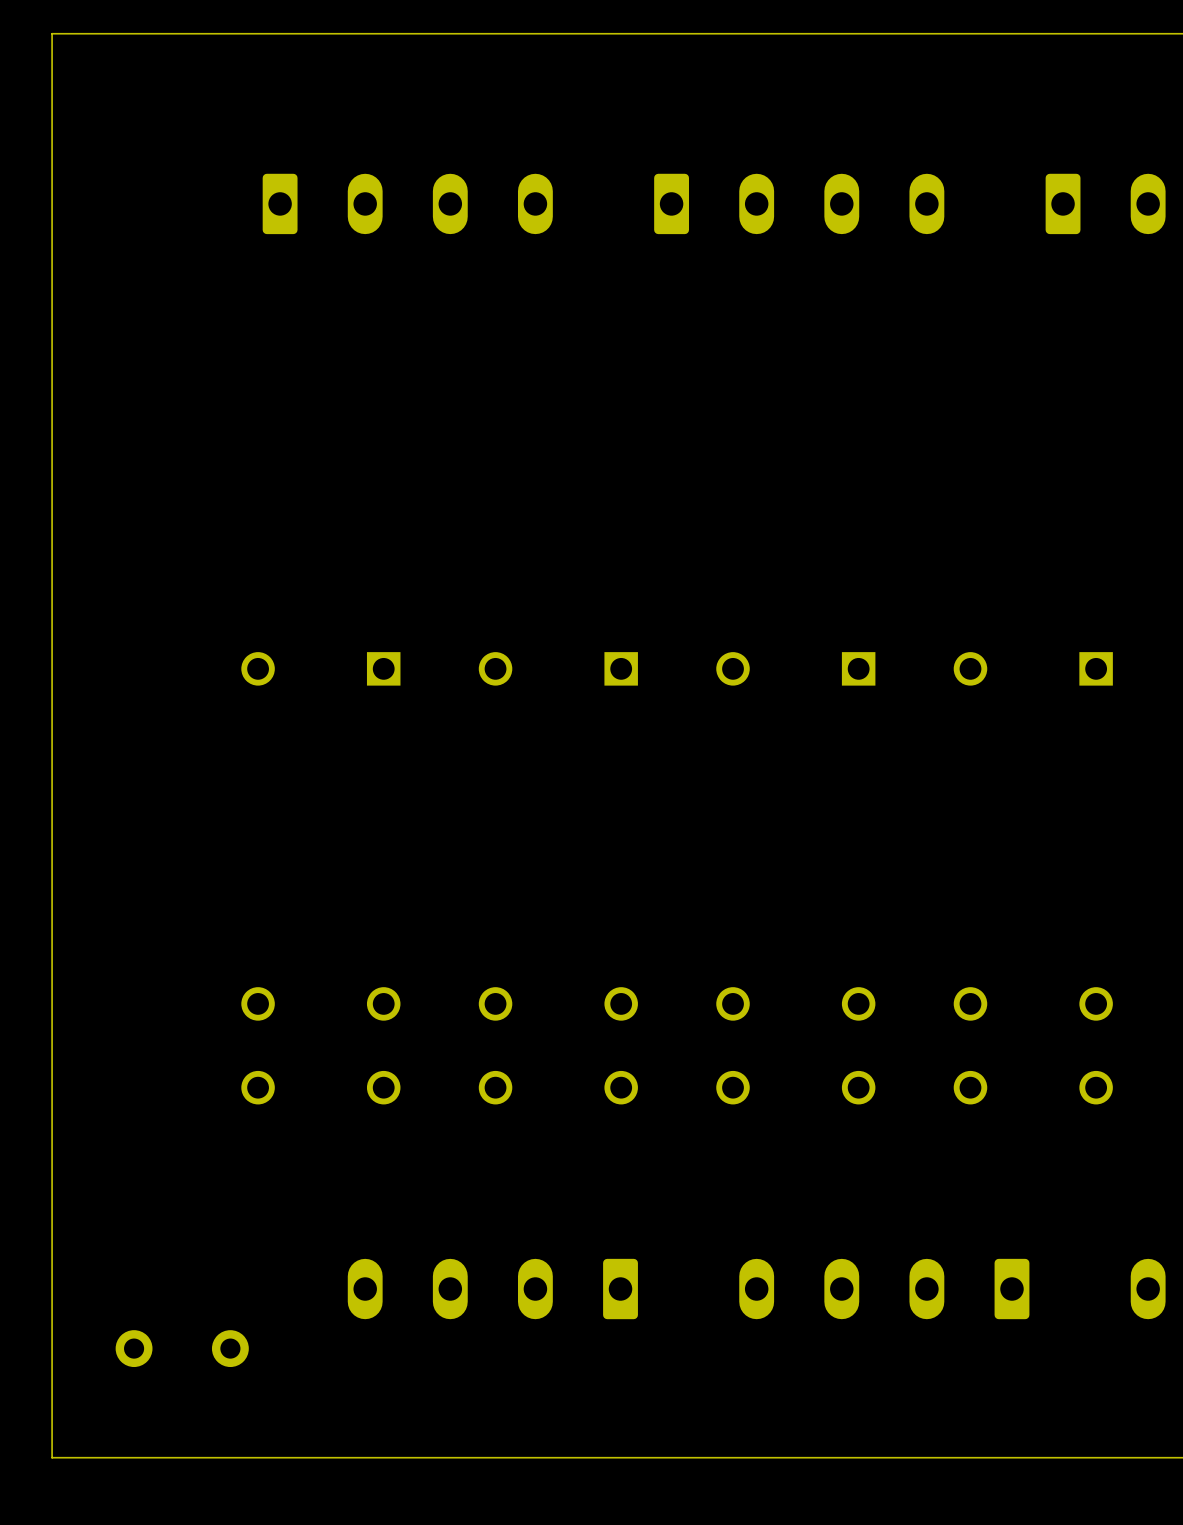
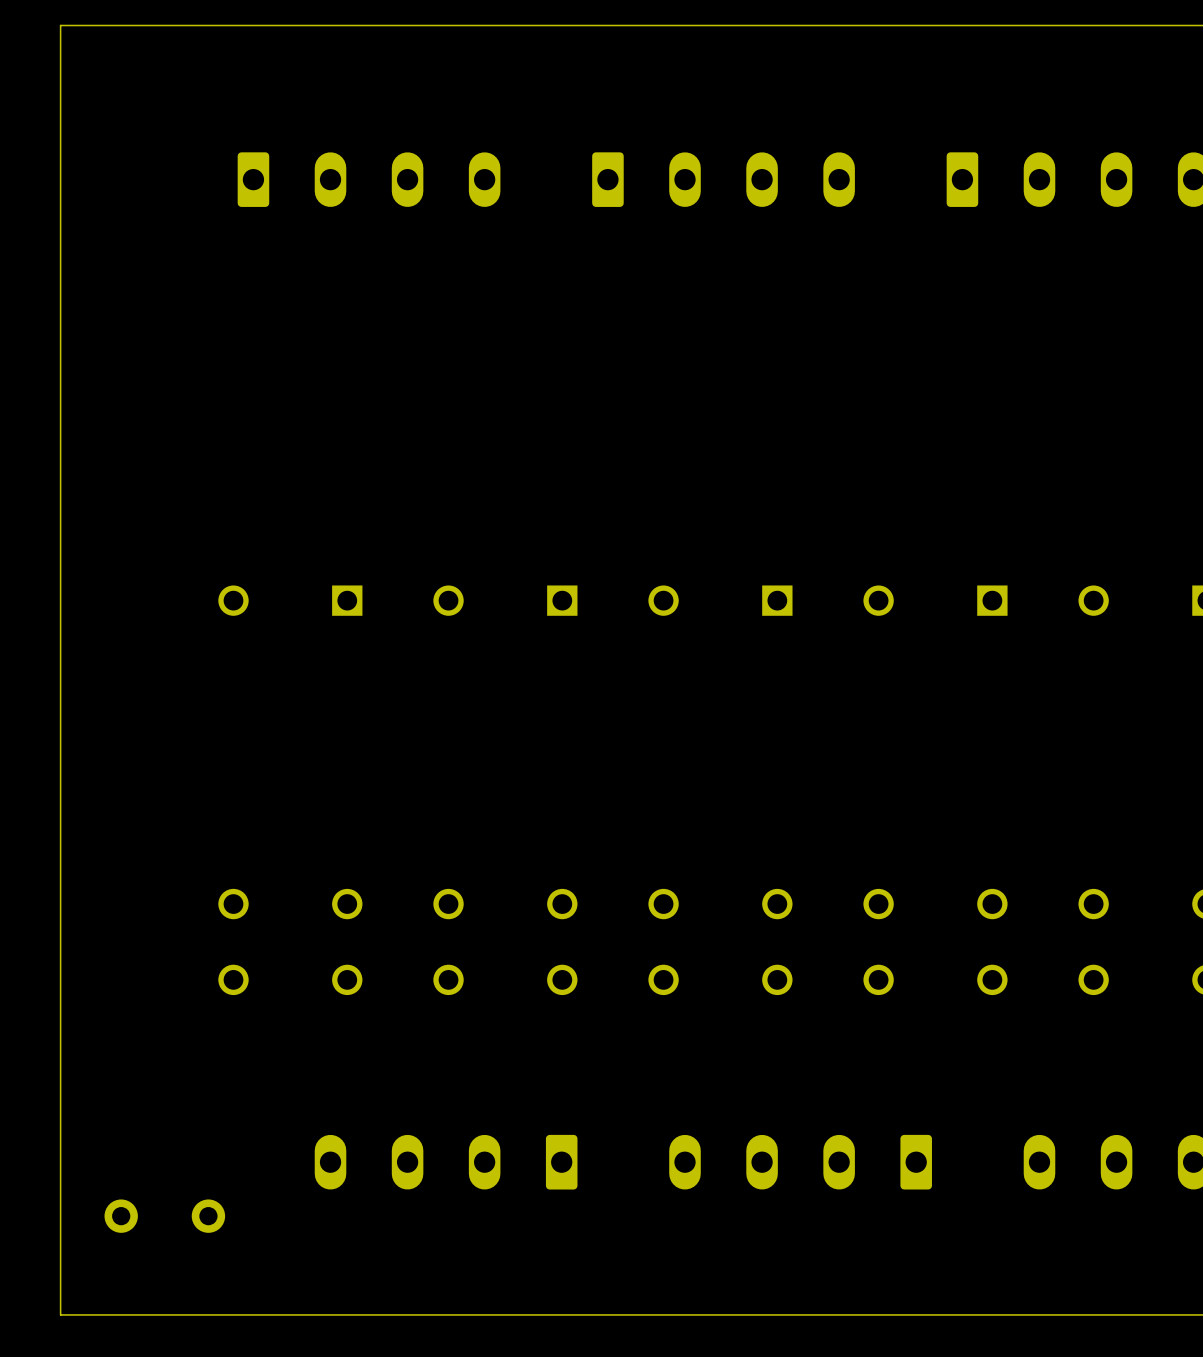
board edge: (67, 33) (52, 33) (52, 1457) (67, 1457) -> (60, 25) (60, 1314)

